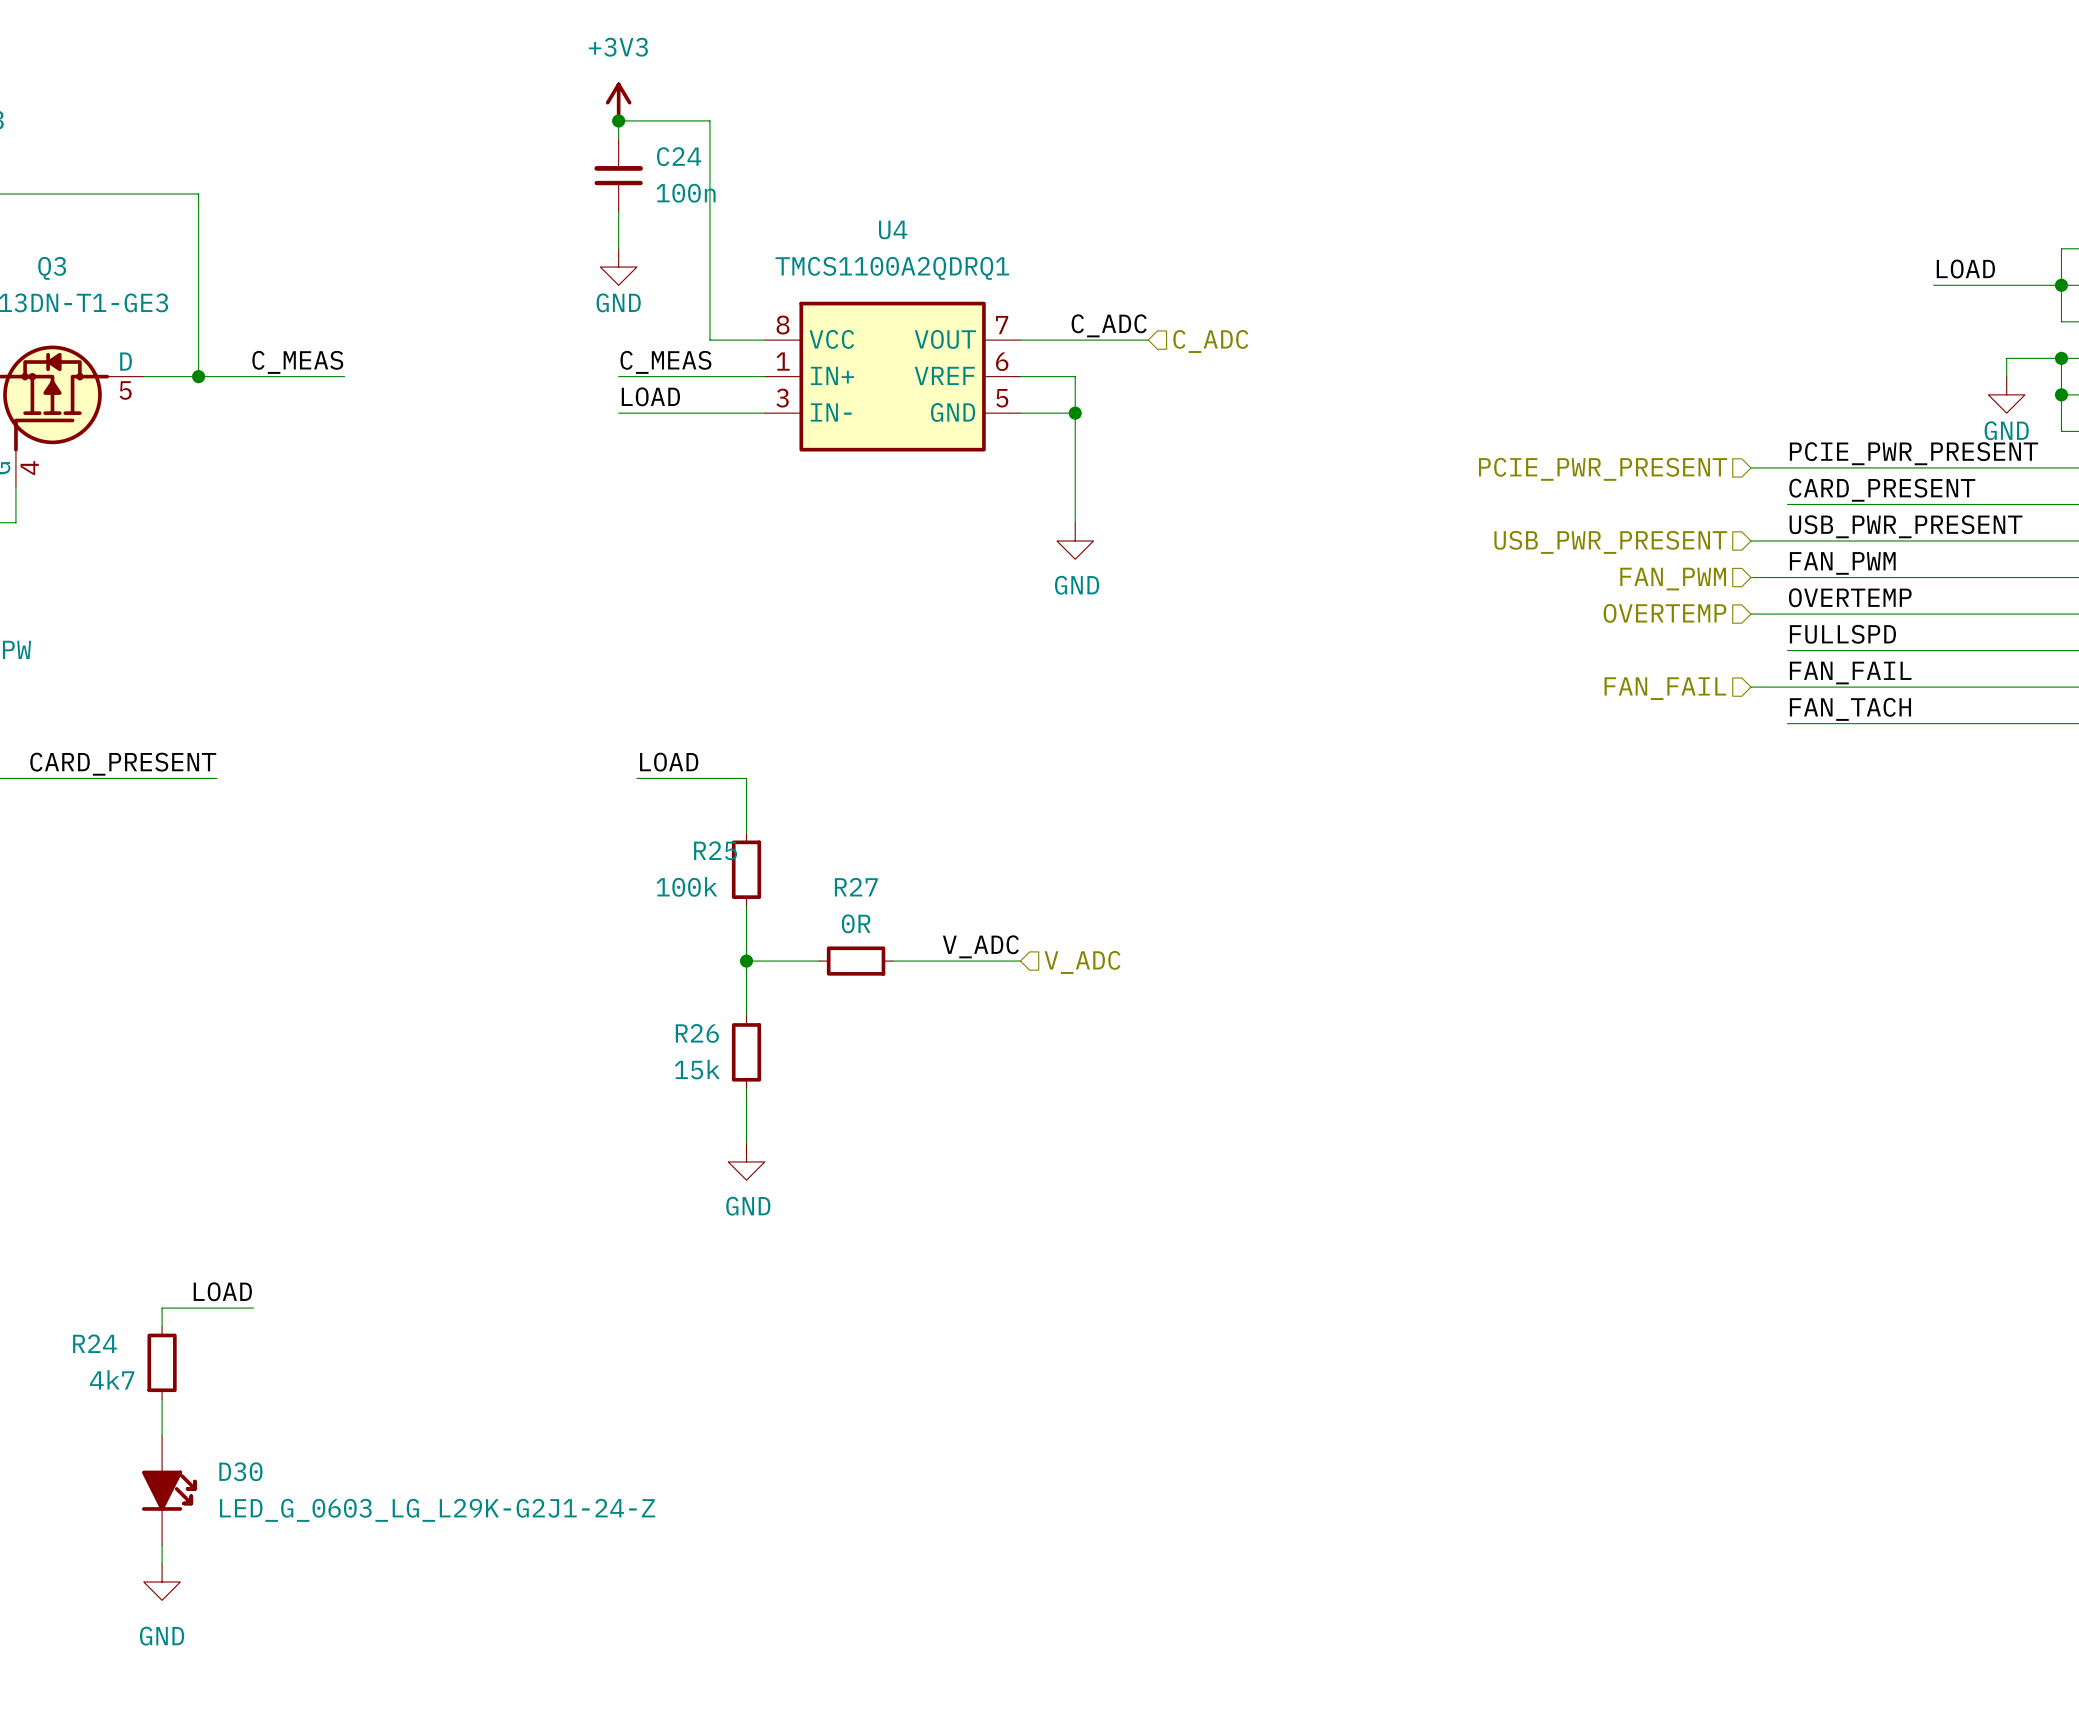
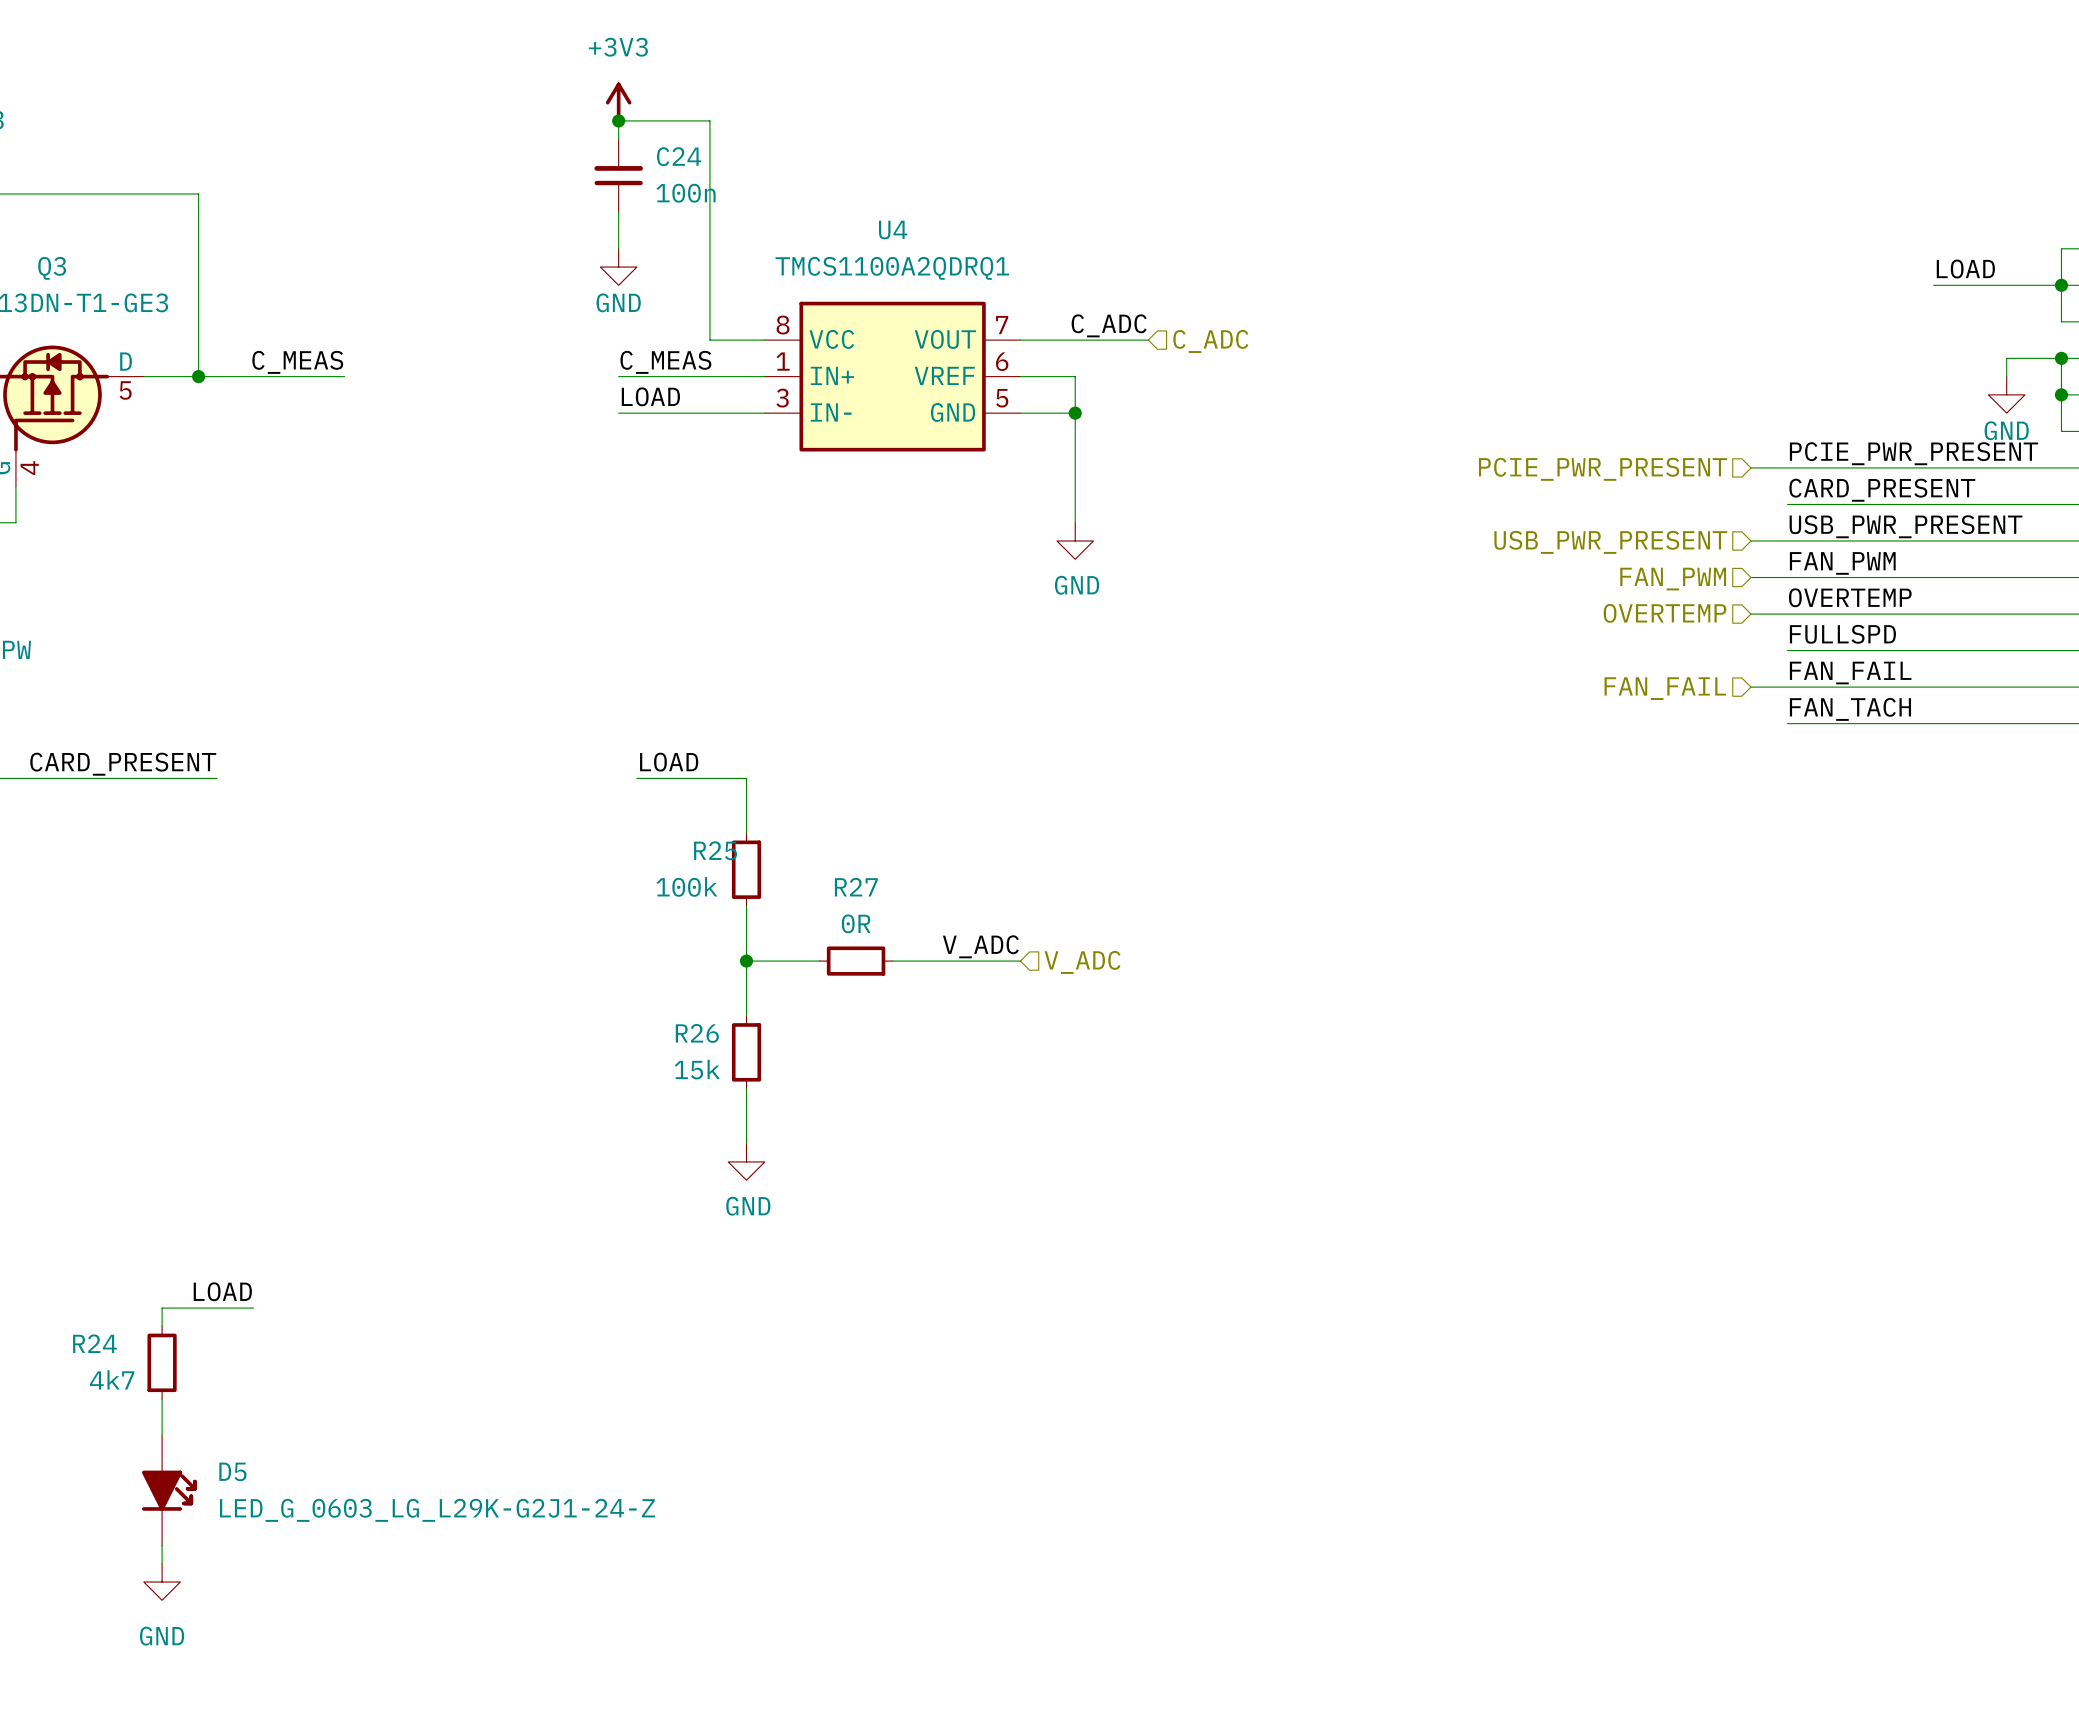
D30 name: D30 (240, 1471) -> D5 (232, 1471)

